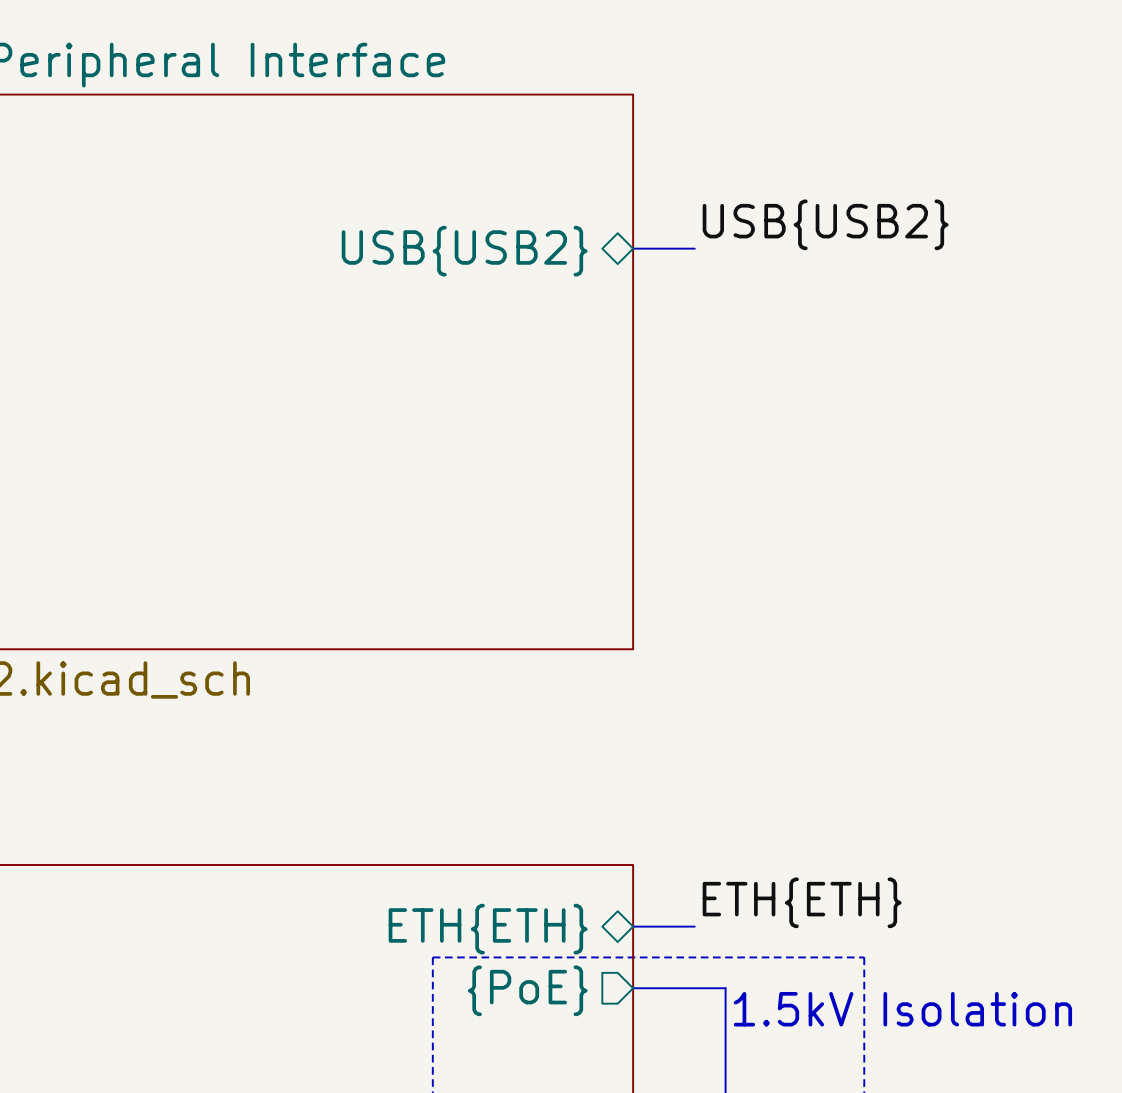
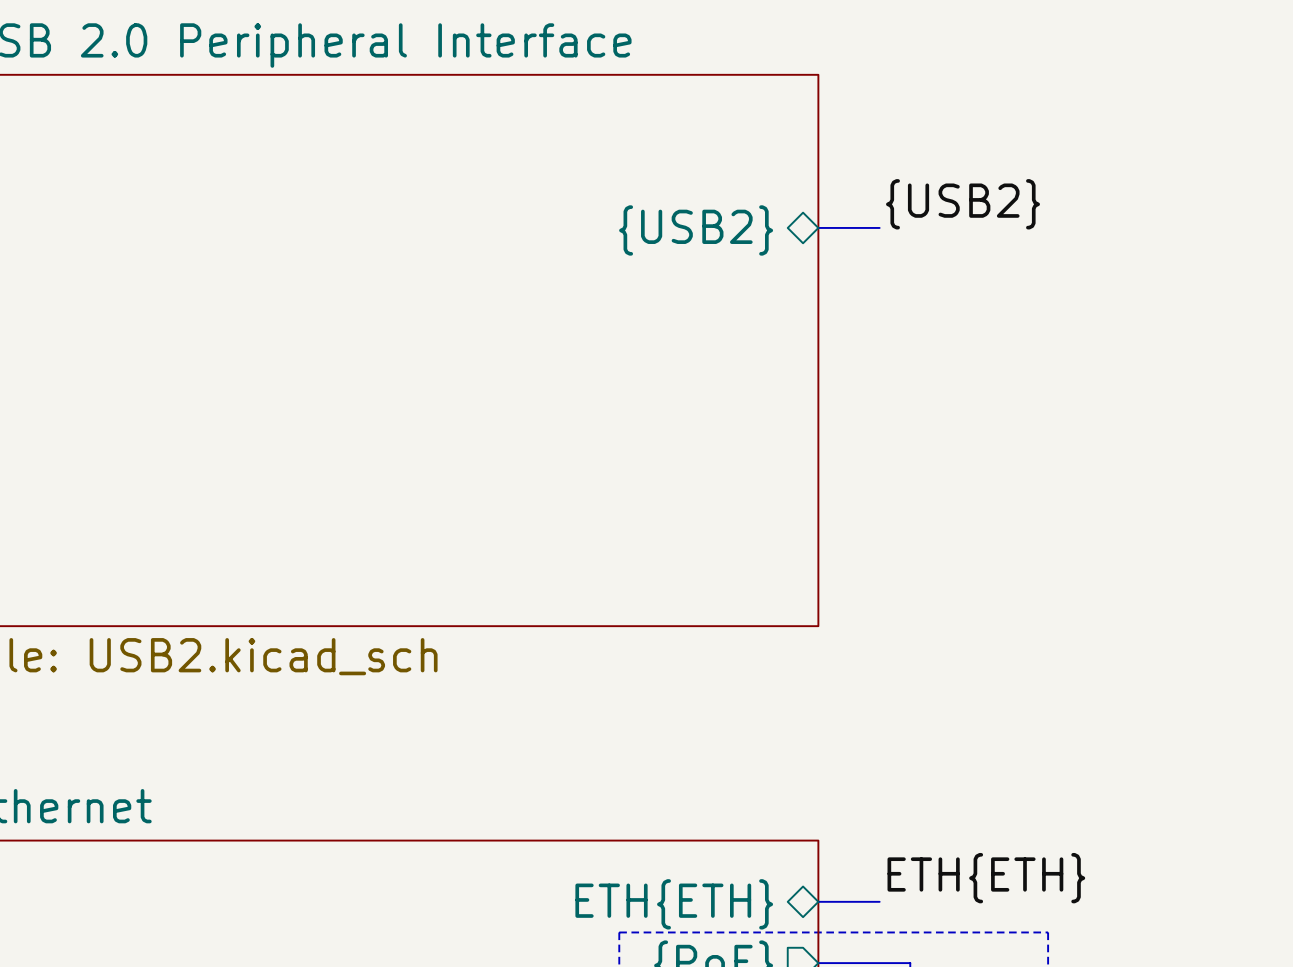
label: USB{USB2} (825, 224) -> {USB2} (963, 204)
sheet pin: USB{USB2} (464, 251) -> {USB2} (696, 230)

